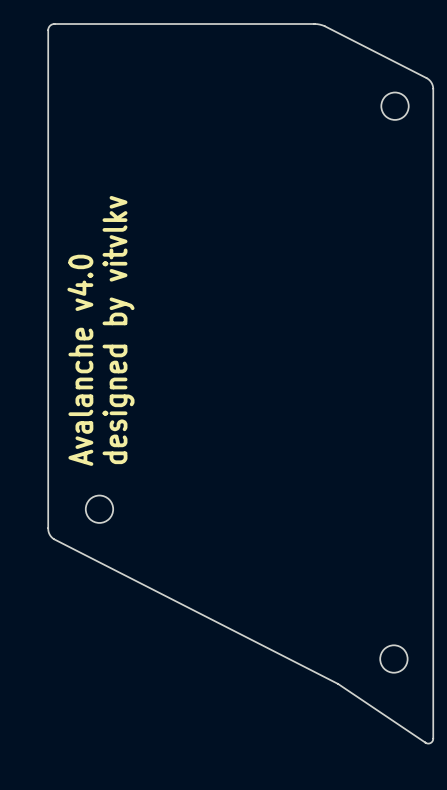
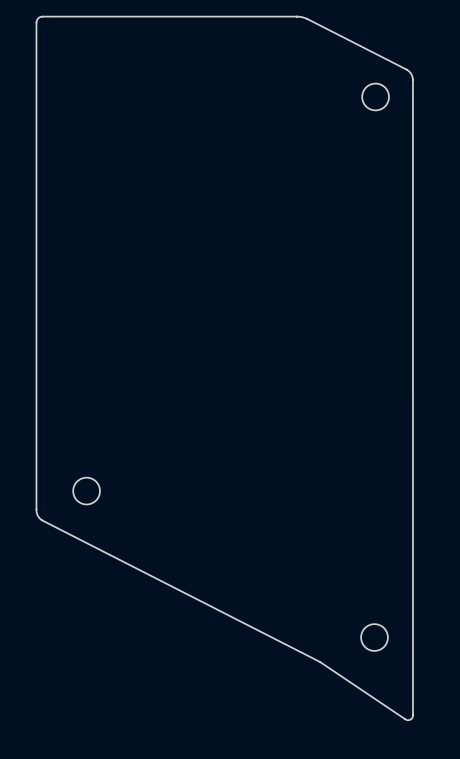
text: designed by vitvlkv (118, 330) -> none
text: Avalanche v4.0 (80, 360) -> none

